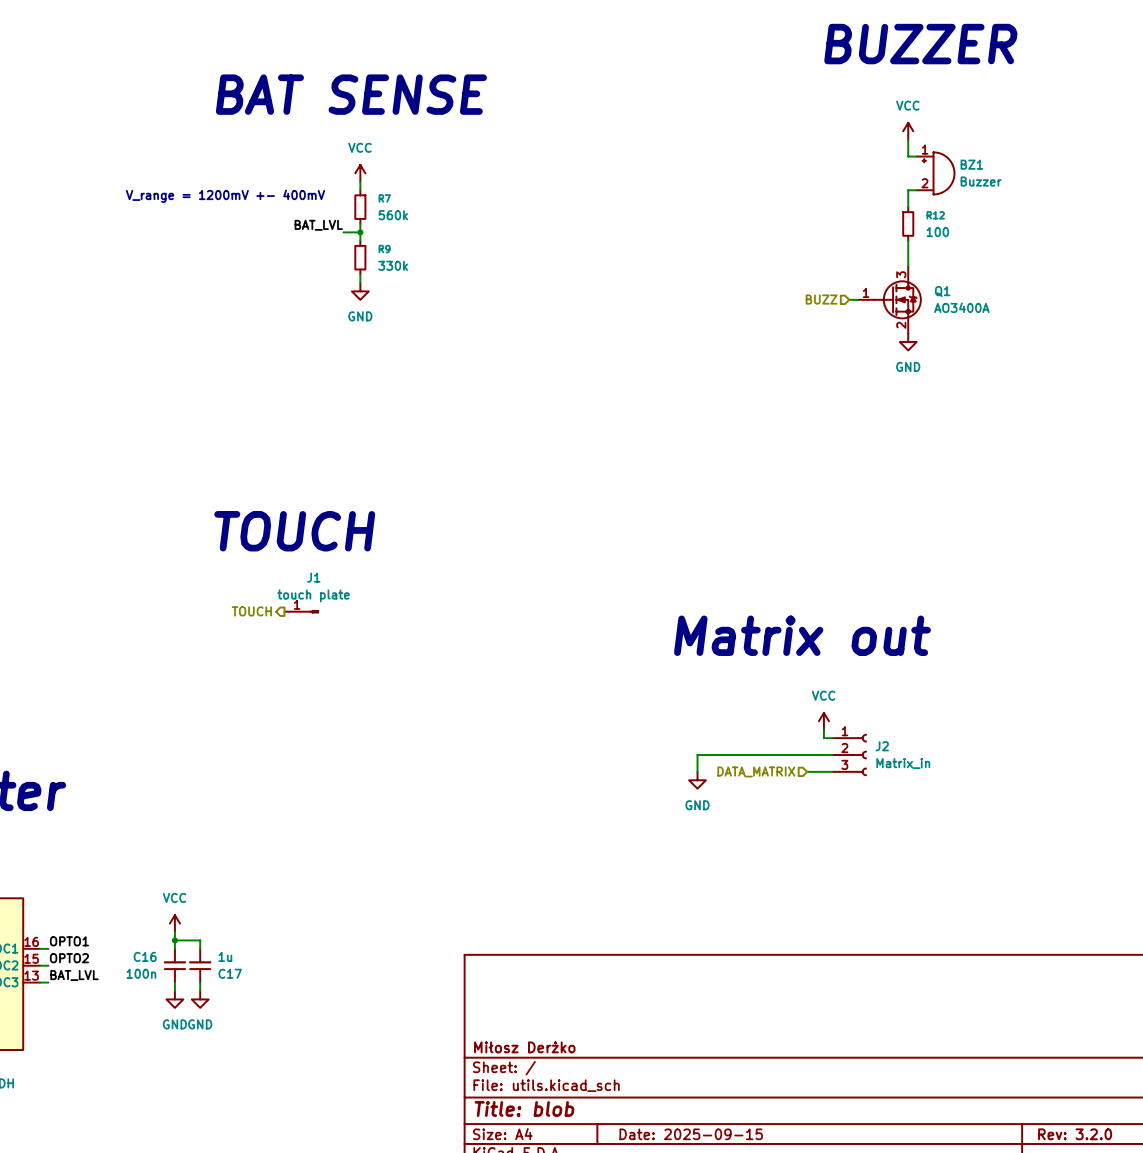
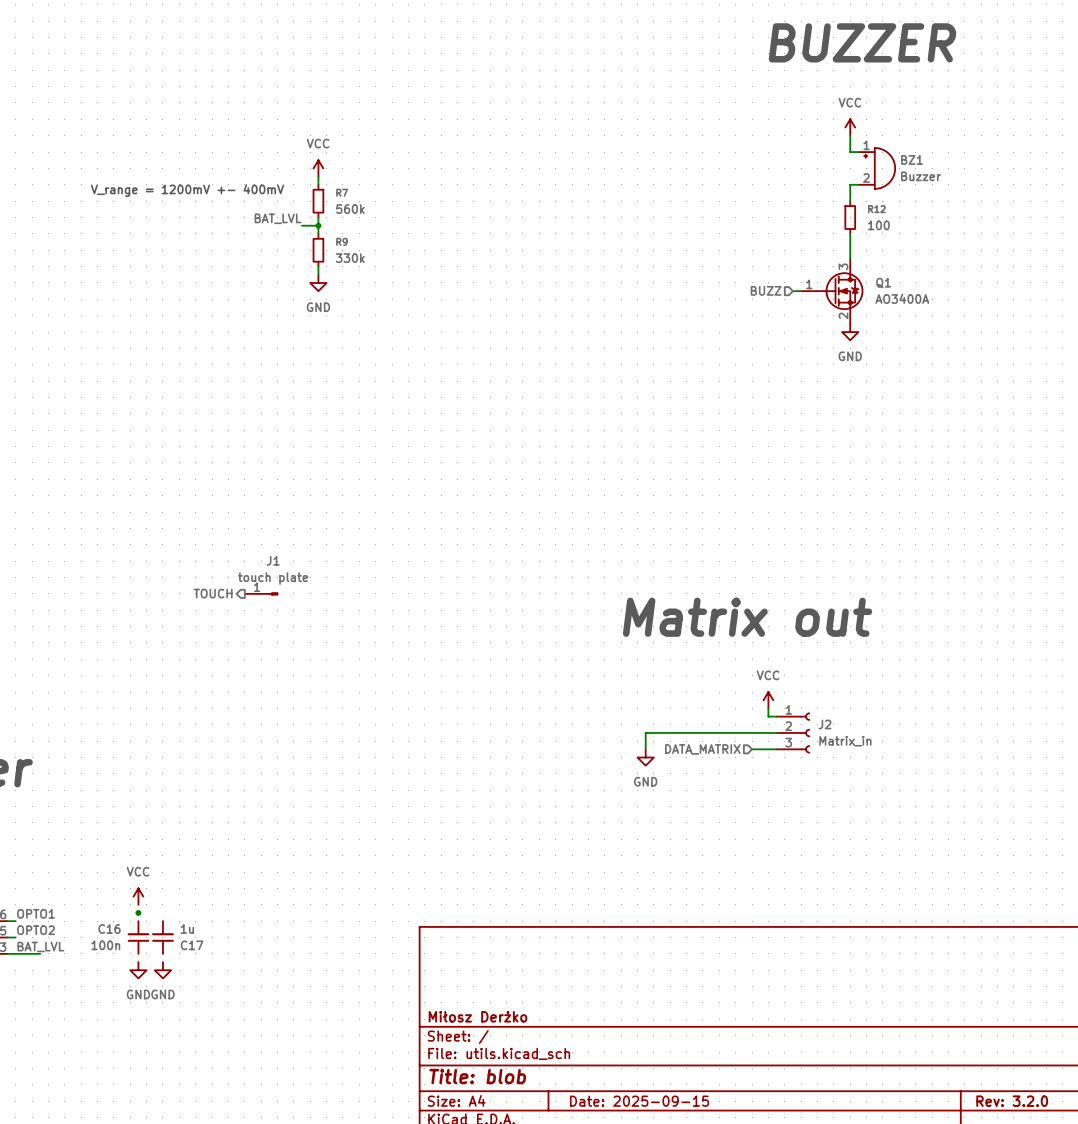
text: BAT SENSE (351, 94) -> none
text: TOUCH (294, 531) -> none
wire: (174, 932) (174, 948) -> none
wire: (174, 940) (200, 940) (200, 948) -> none
wire: none -> (15, 953) (40, 953)
wire: (174, 982) (174, 991) -> none
wire: (200, 982) (200, 991) -> none

